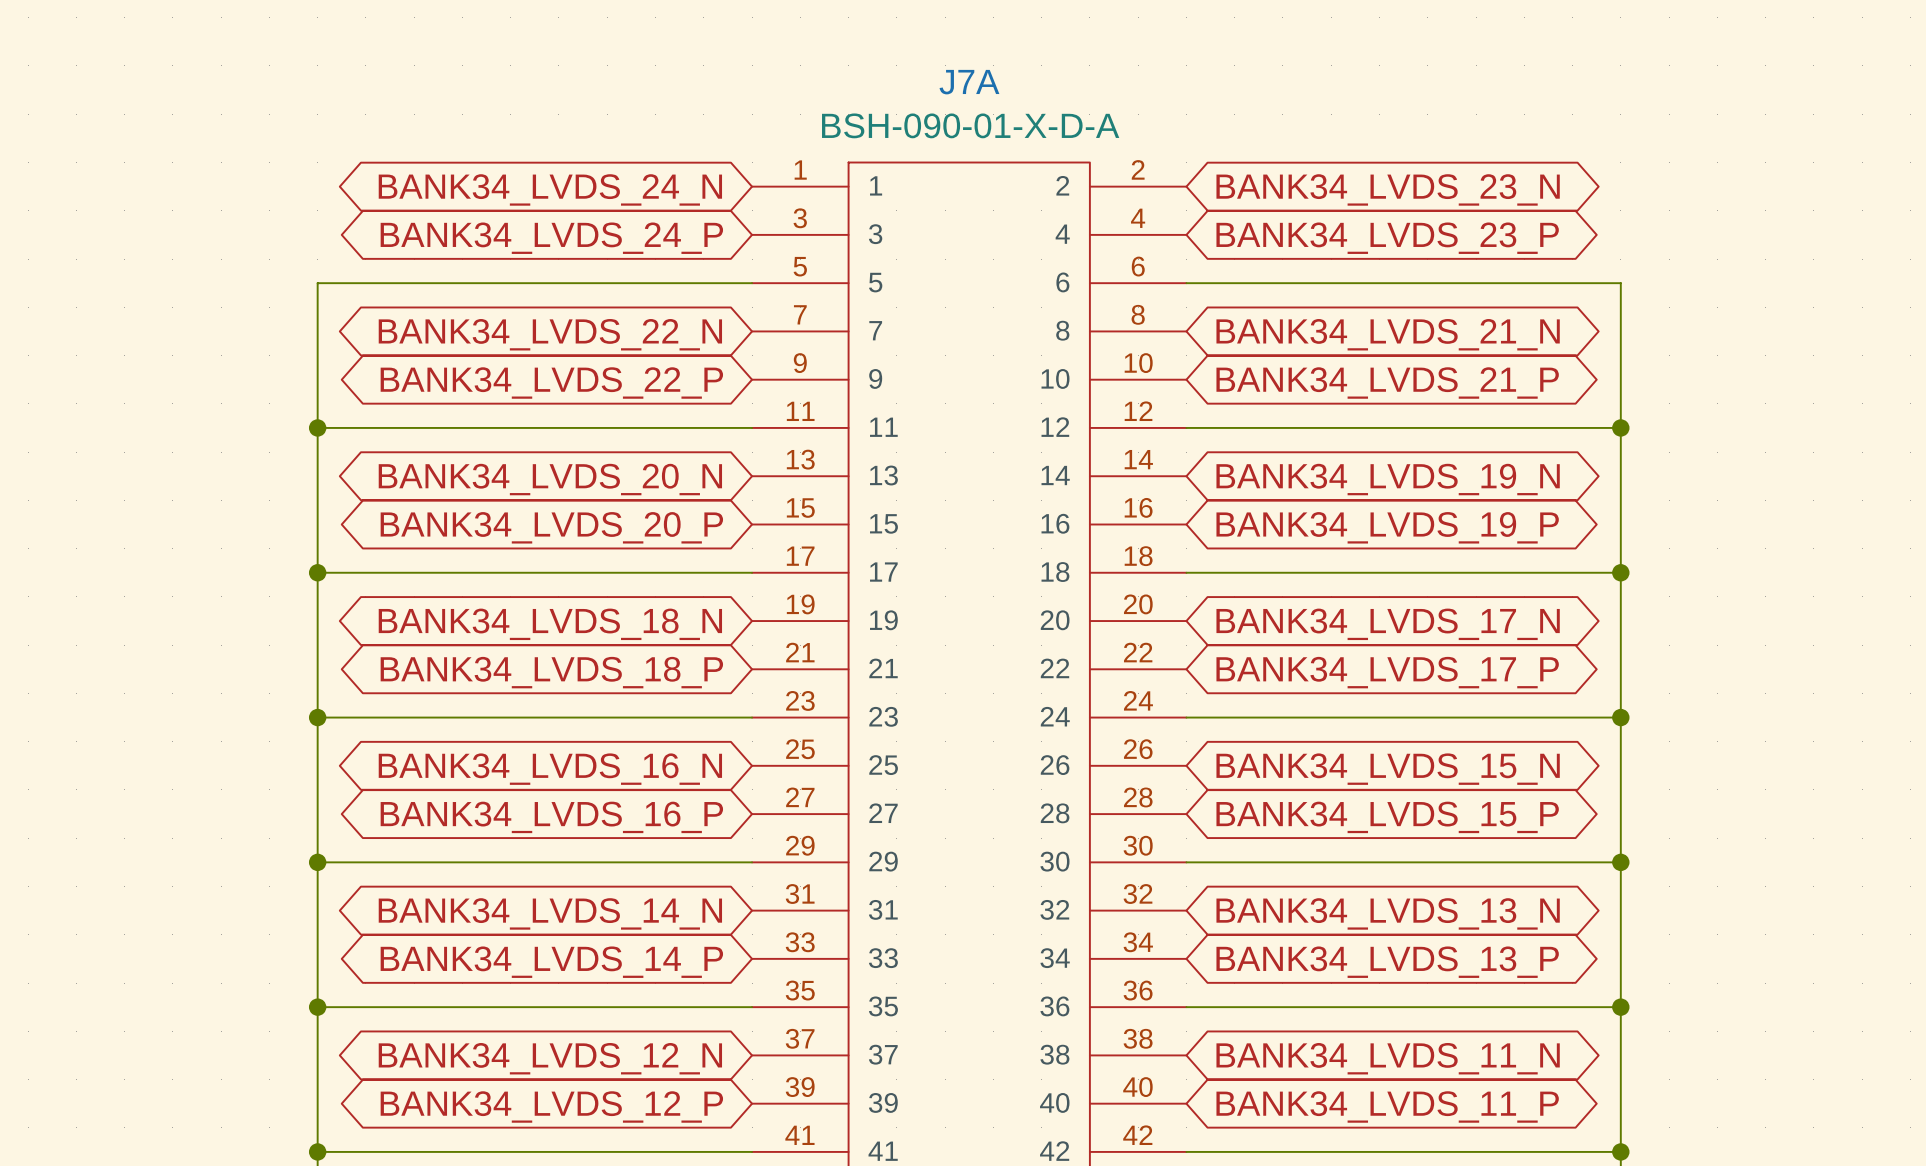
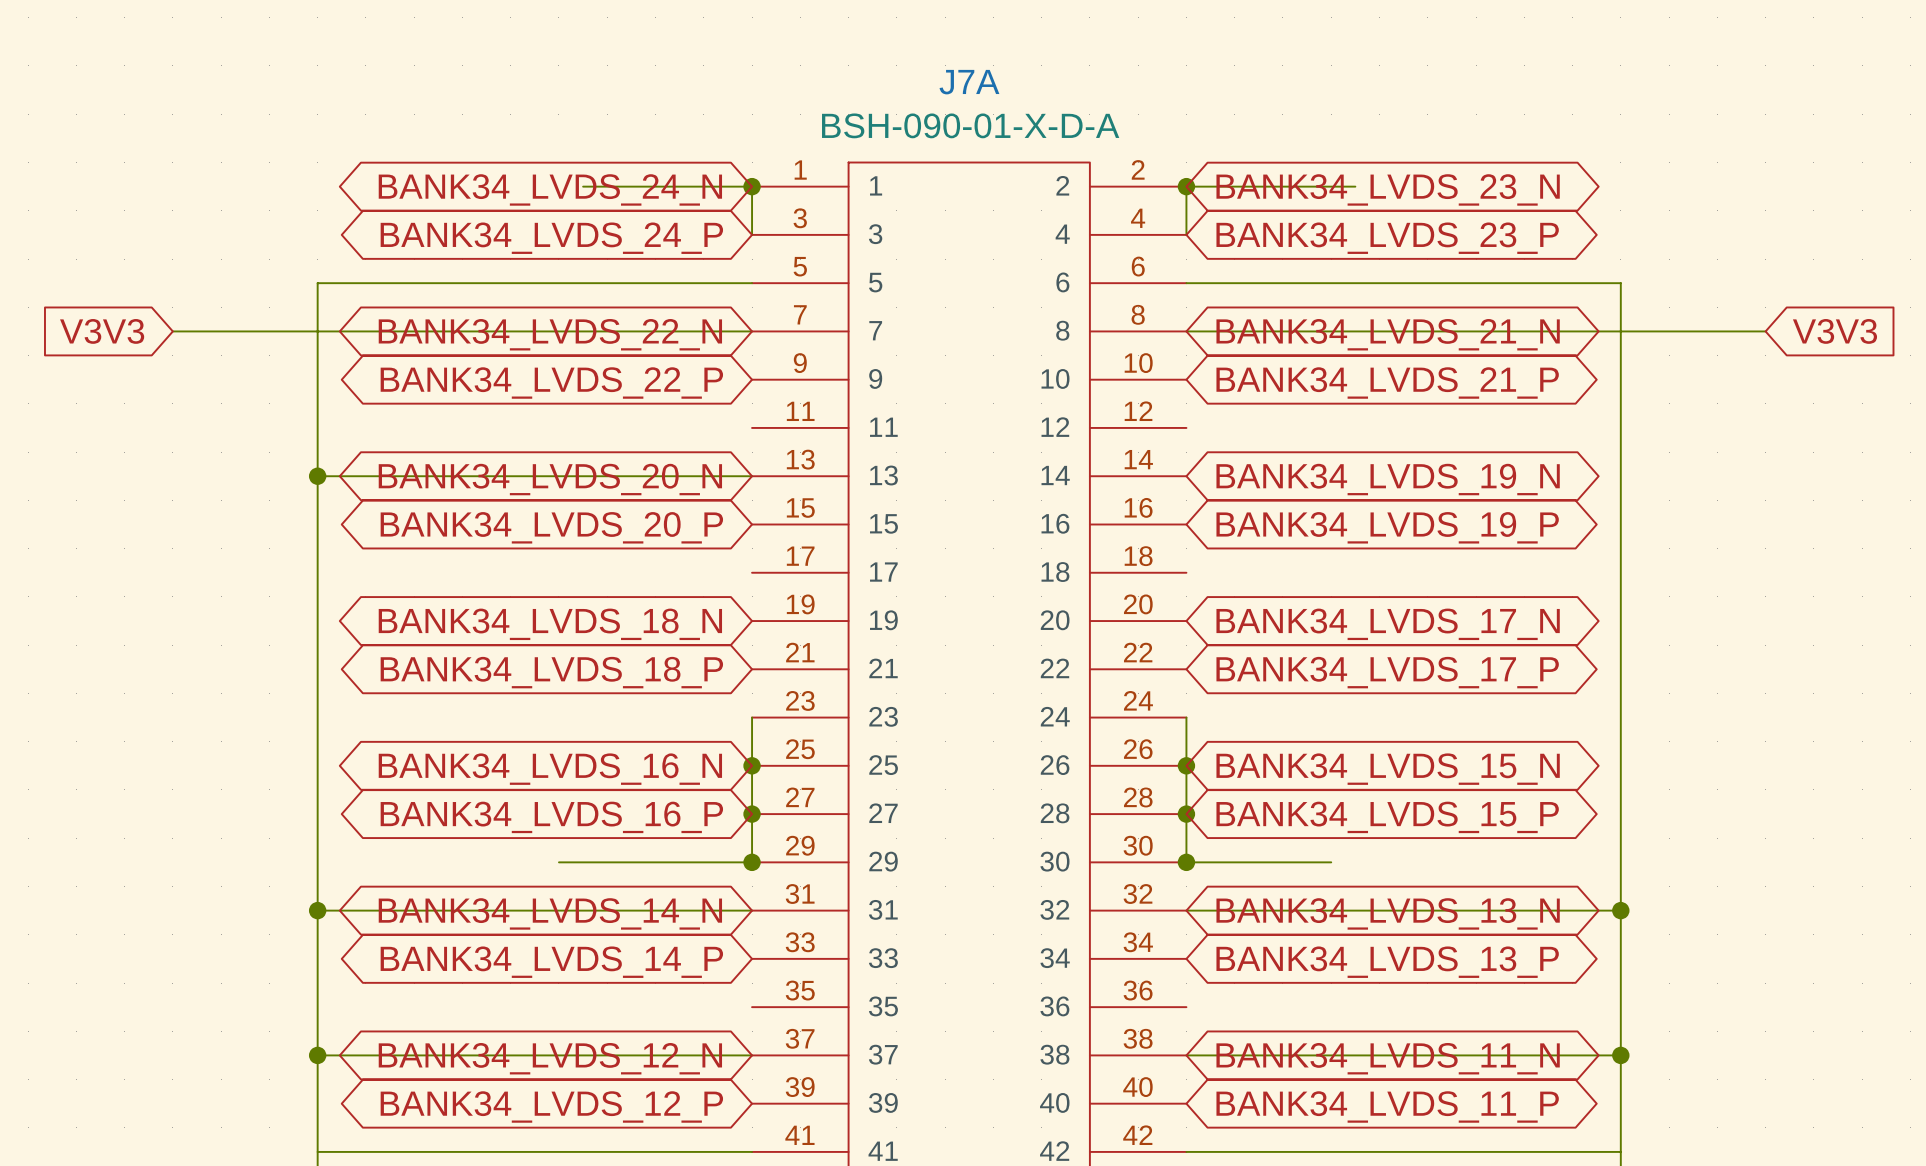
wire: none -> (583, 186) (752, 186) (752, 234)
junction: none -> (752, 186)
junction: none -> (1186, 186)
wire: none -> (1355, 186) (1186, 186) (1186, 234)
global label: none -> V3V3 (102, 331)
wire: none -> (172, 331) (752, 331)
wire: none -> (1186, 331) (1765, 331)
global label: none -> V3V3 (1834, 331)
wire: (317, 427) (752, 427) -> (317, 476) (752, 476)
junction: (317, 427) -> none
wire: (1186, 427) (1620, 427) -> none
junction: (1620, 427) -> none
junction: none -> (317, 476)
wire: (317, 572) (752, 572) -> (317, 910) (752, 910)
junction: (317, 572) -> none
wire: (1186, 572) (1620, 572) -> (1186, 910) (1620, 910)
junction: (1620, 572) -> none
wire: (317, 717) (752, 717) -> (752, 862) (752, 717)
junction: (317, 717) -> none
wire: (1186, 717) (1620, 717) -> (1186, 717) (1186, 862)
junction: (1620, 717) -> none
junction: none -> (752, 765)
junction: none -> (1186, 765)
junction: none -> (752, 814)
junction: none -> (1186, 814)
wire: (317, 862) (558, 862) -> none
junction: (317, 862) -> none
junction: none -> (752, 862)
junction: none -> (1186, 862)
wire: (1331, 862) (1620, 862) -> none
junction: (1620, 862) -> none
junction: none -> (317, 910)
junction: none -> (1620, 910)
wire: (317, 1007) (752, 1007) -> (317, 1055) (752, 1055)
junction: (317, 1007) -> none
wire: (1186, 1007) (1620, 1007) -> (1186, 1055) (1620, 1055)
junction: (1620, 1007) -> none
junction: none -> (317, 1055)
junction: none -> (1620, 1055)
junction: (317, 1151) -> none
junction: (1620, 1151) -> none

